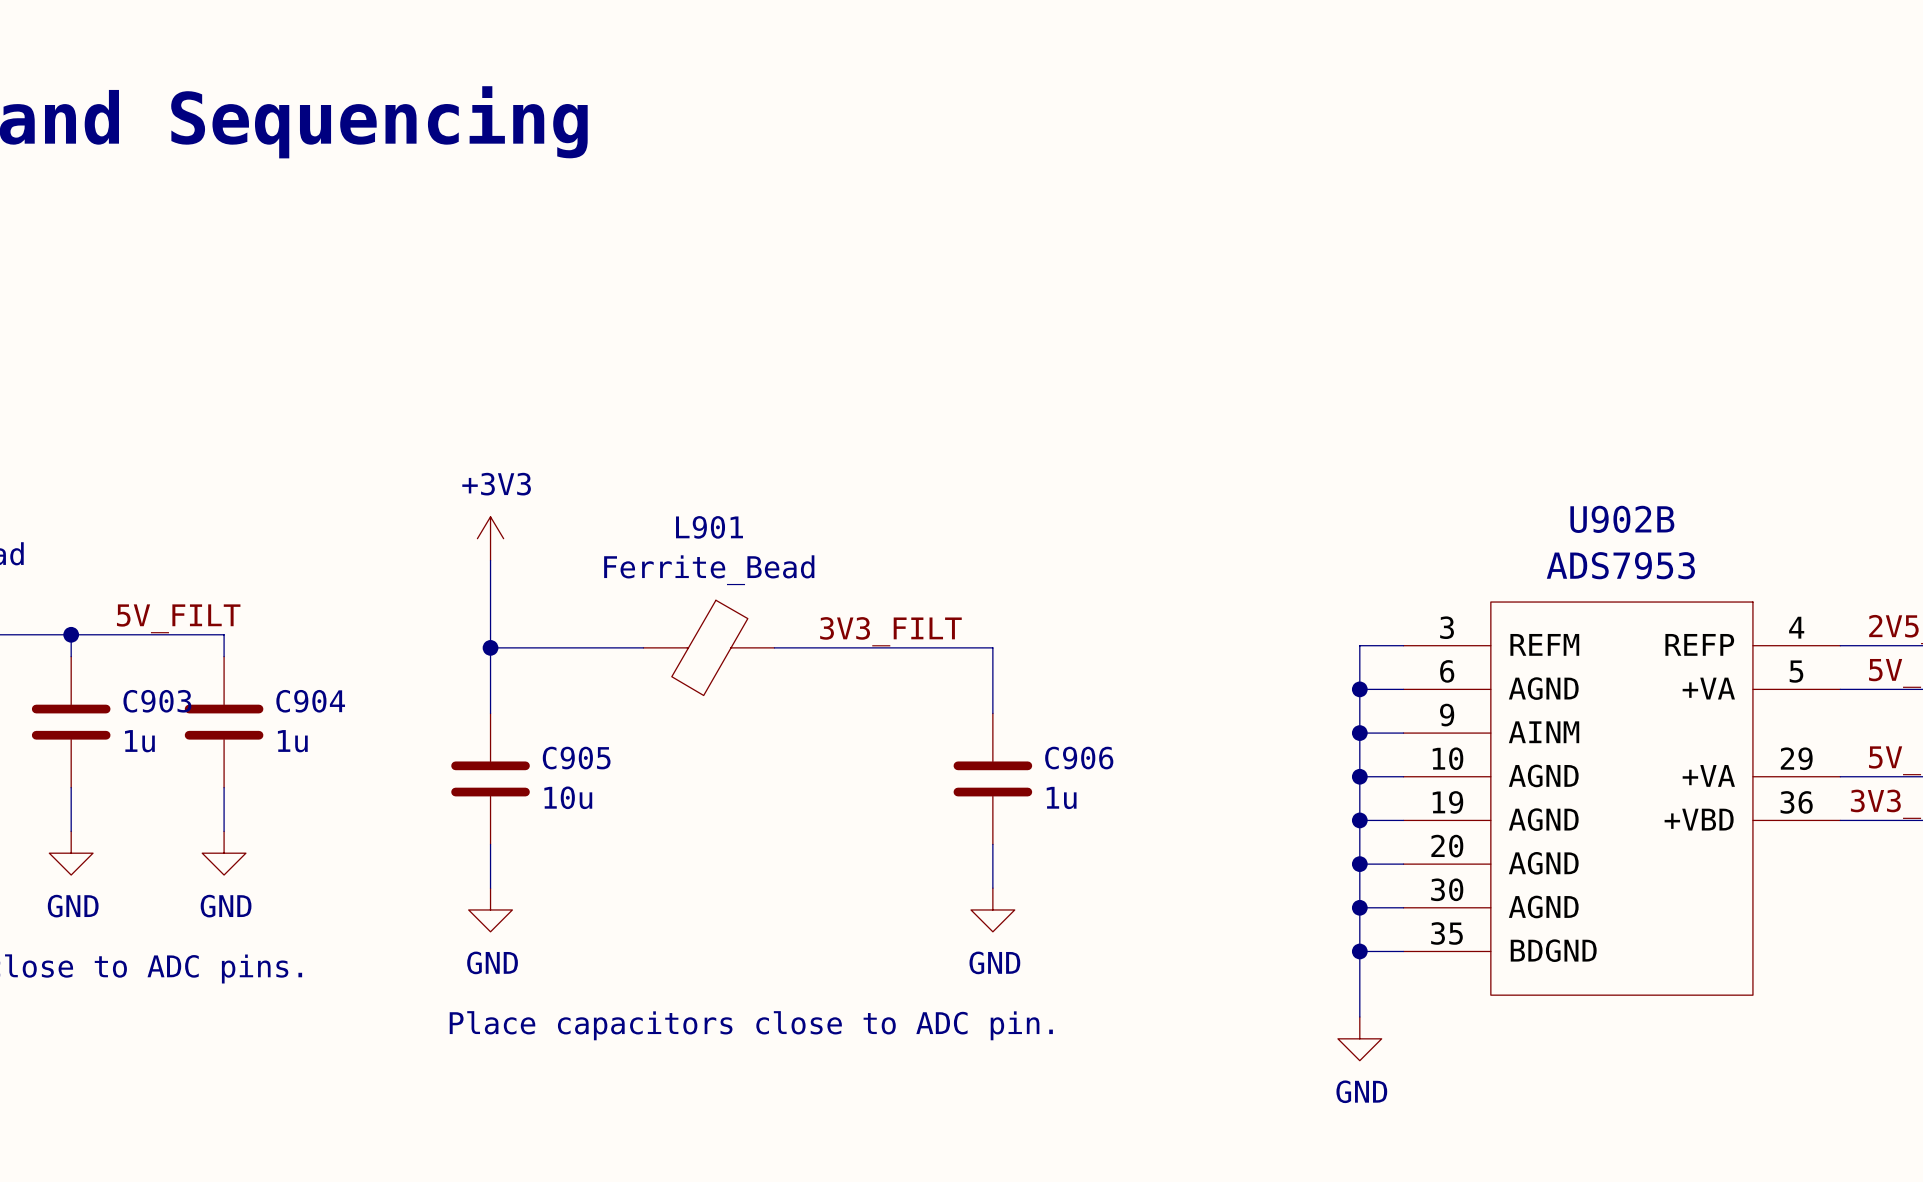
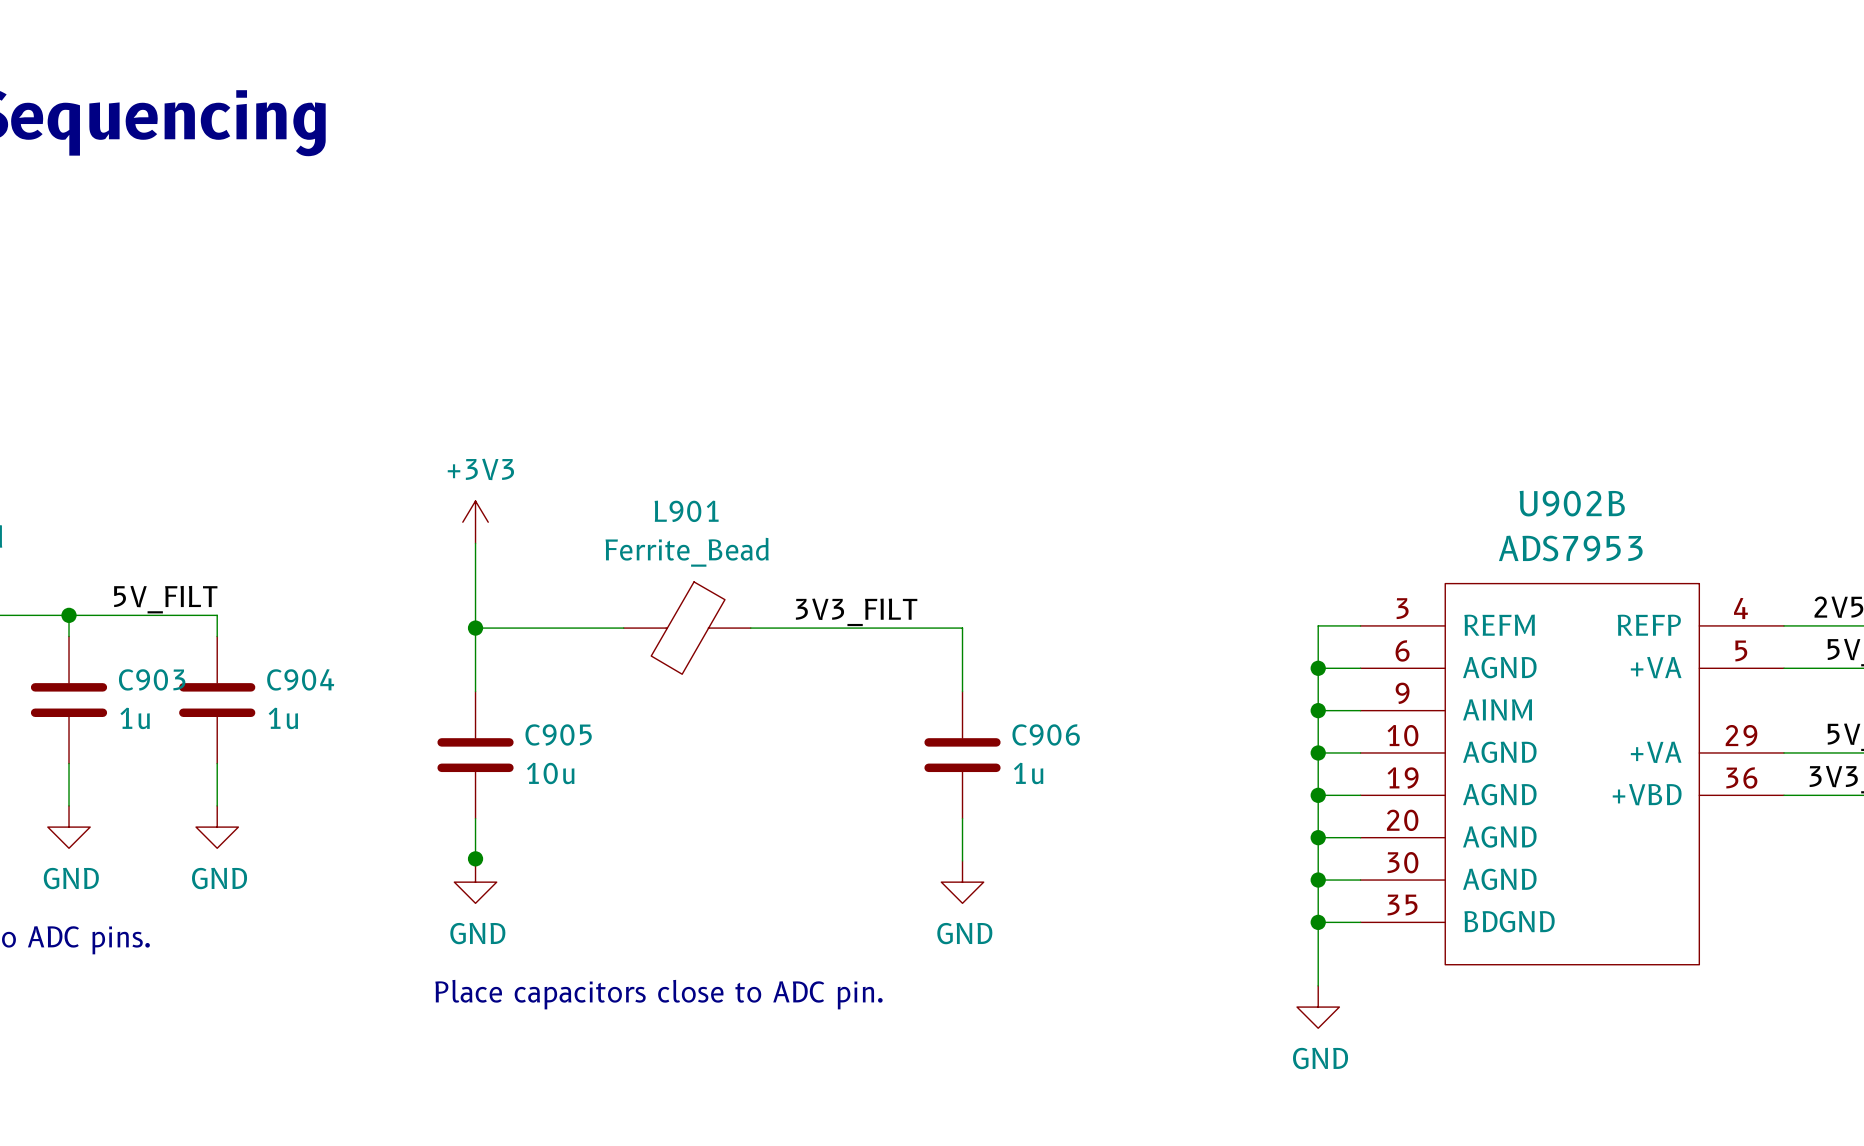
junction: none -> (475, 858)

